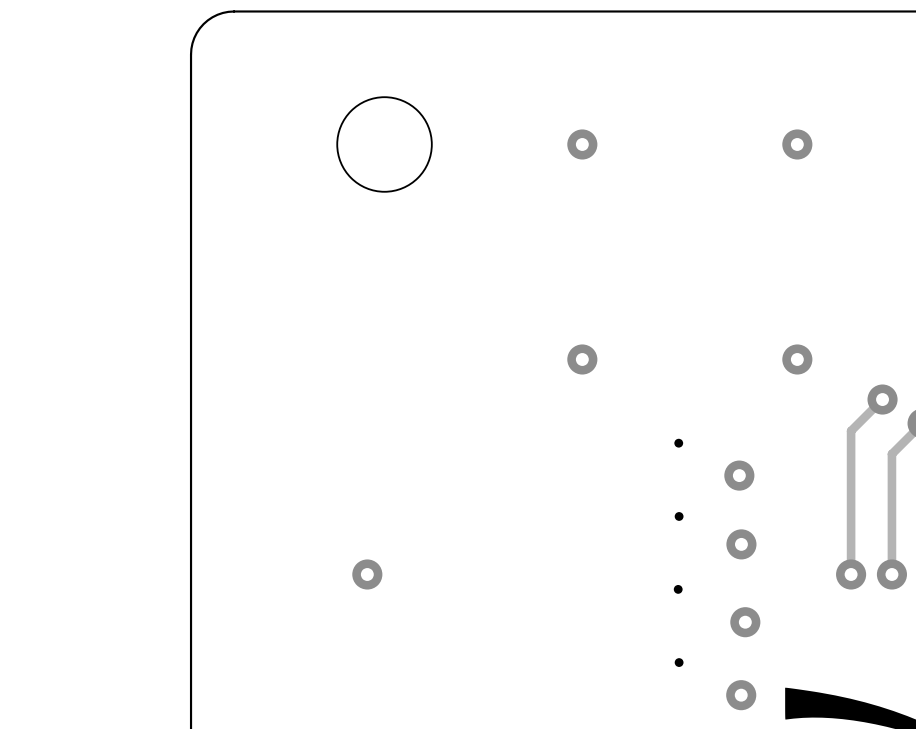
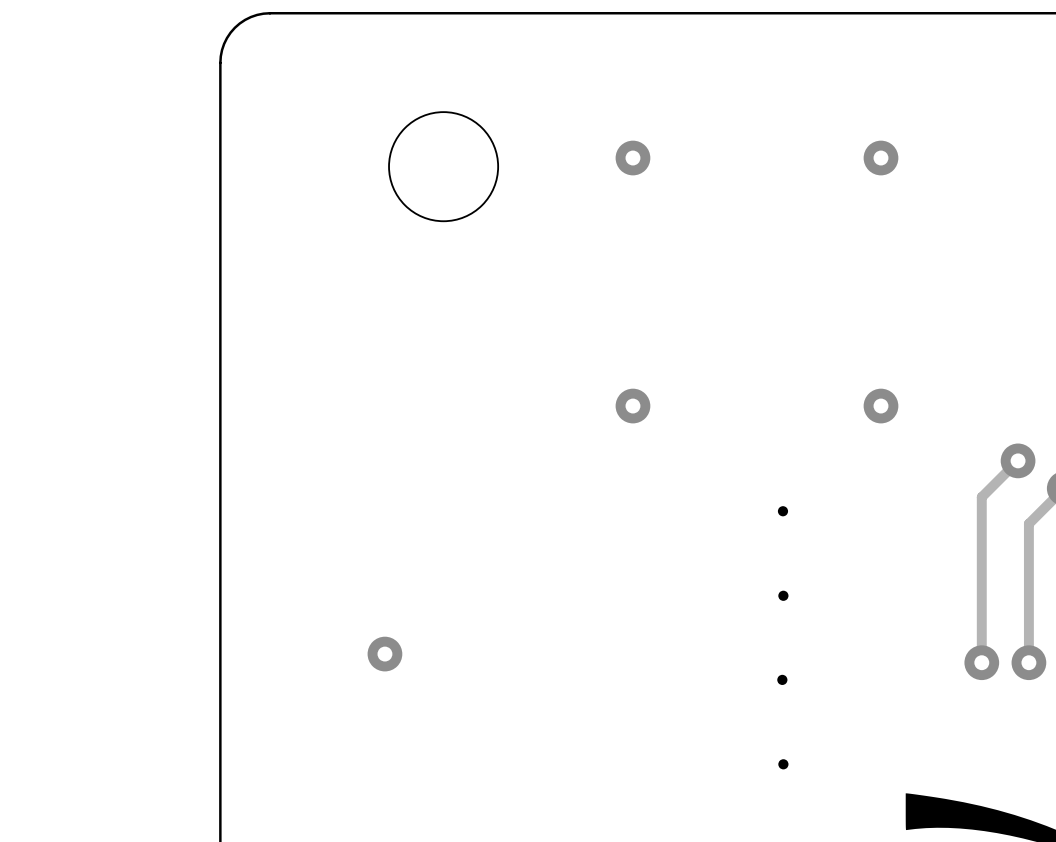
via position: (582, 144) -> (632, 158)
via position: (797, 144) -> (880, 158)
via position: (582, 359) -> (632, 406)
via position: (797, 359) -> (880, 406)
via: (739, 475) -> none
via: (741, 544) -> none
via position: (367, 574) -> (384, 654)
via: (745, 622) -> none
via: (741, 695) -> none

